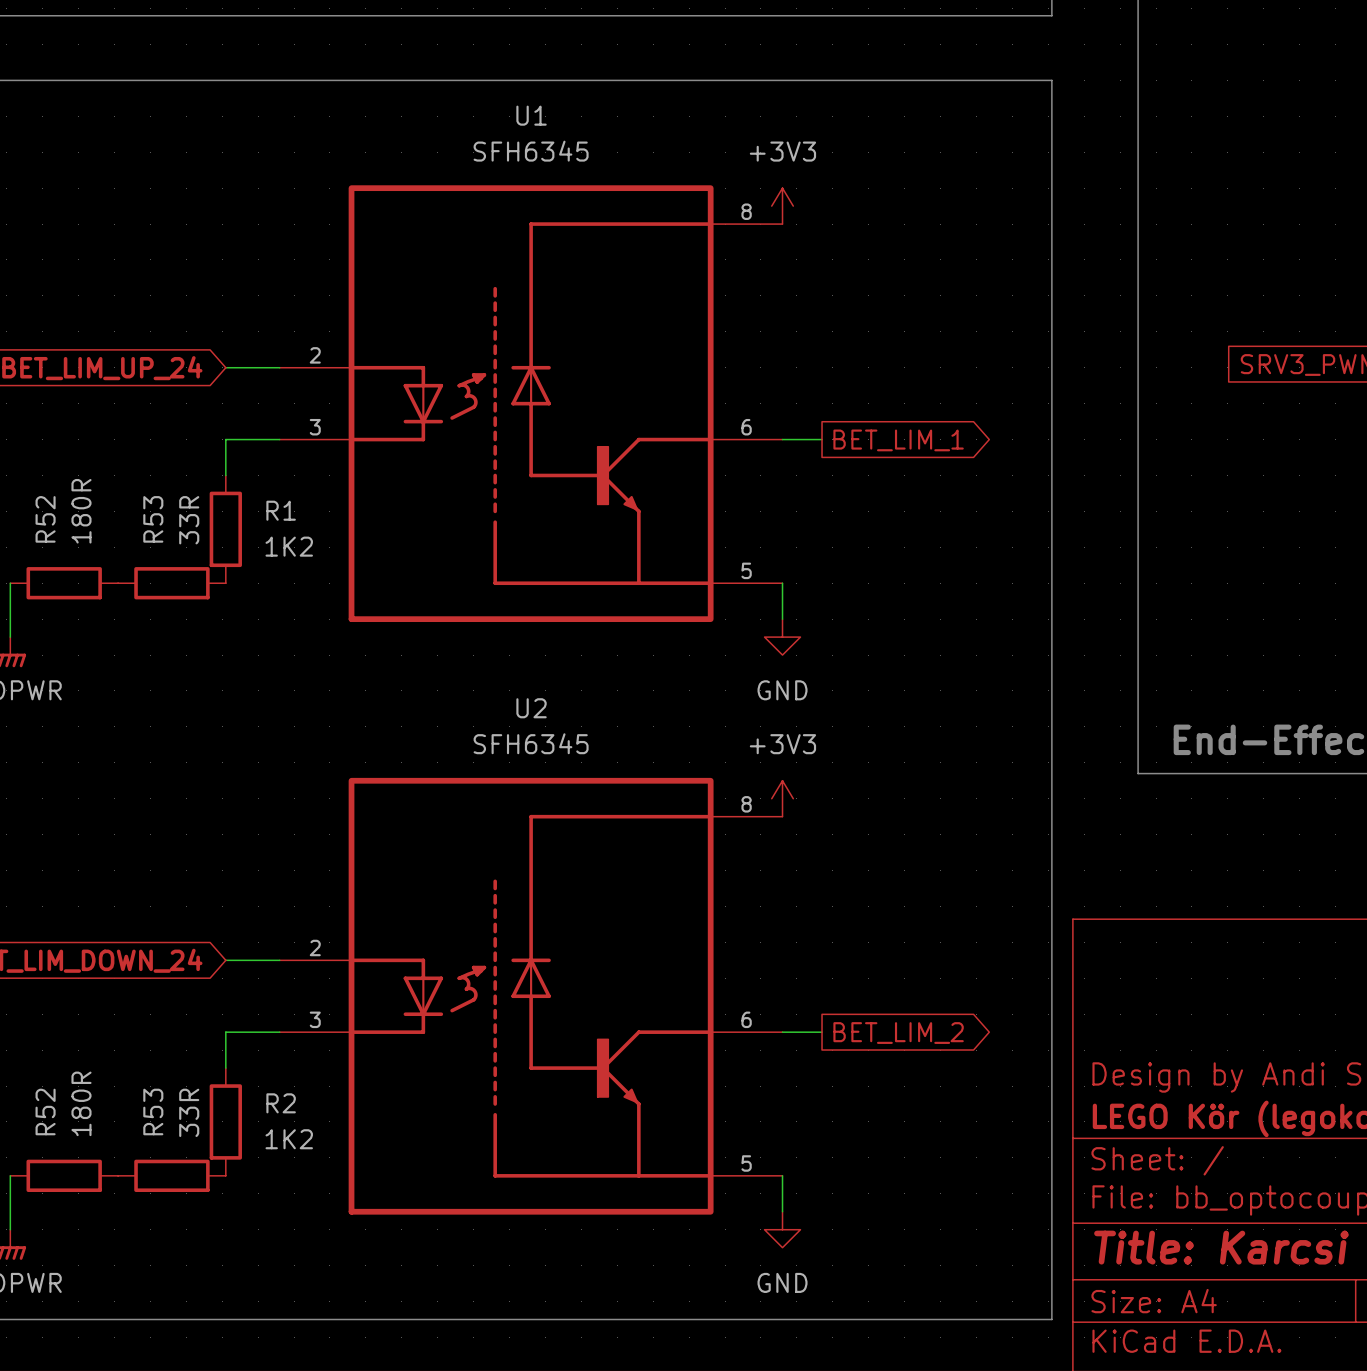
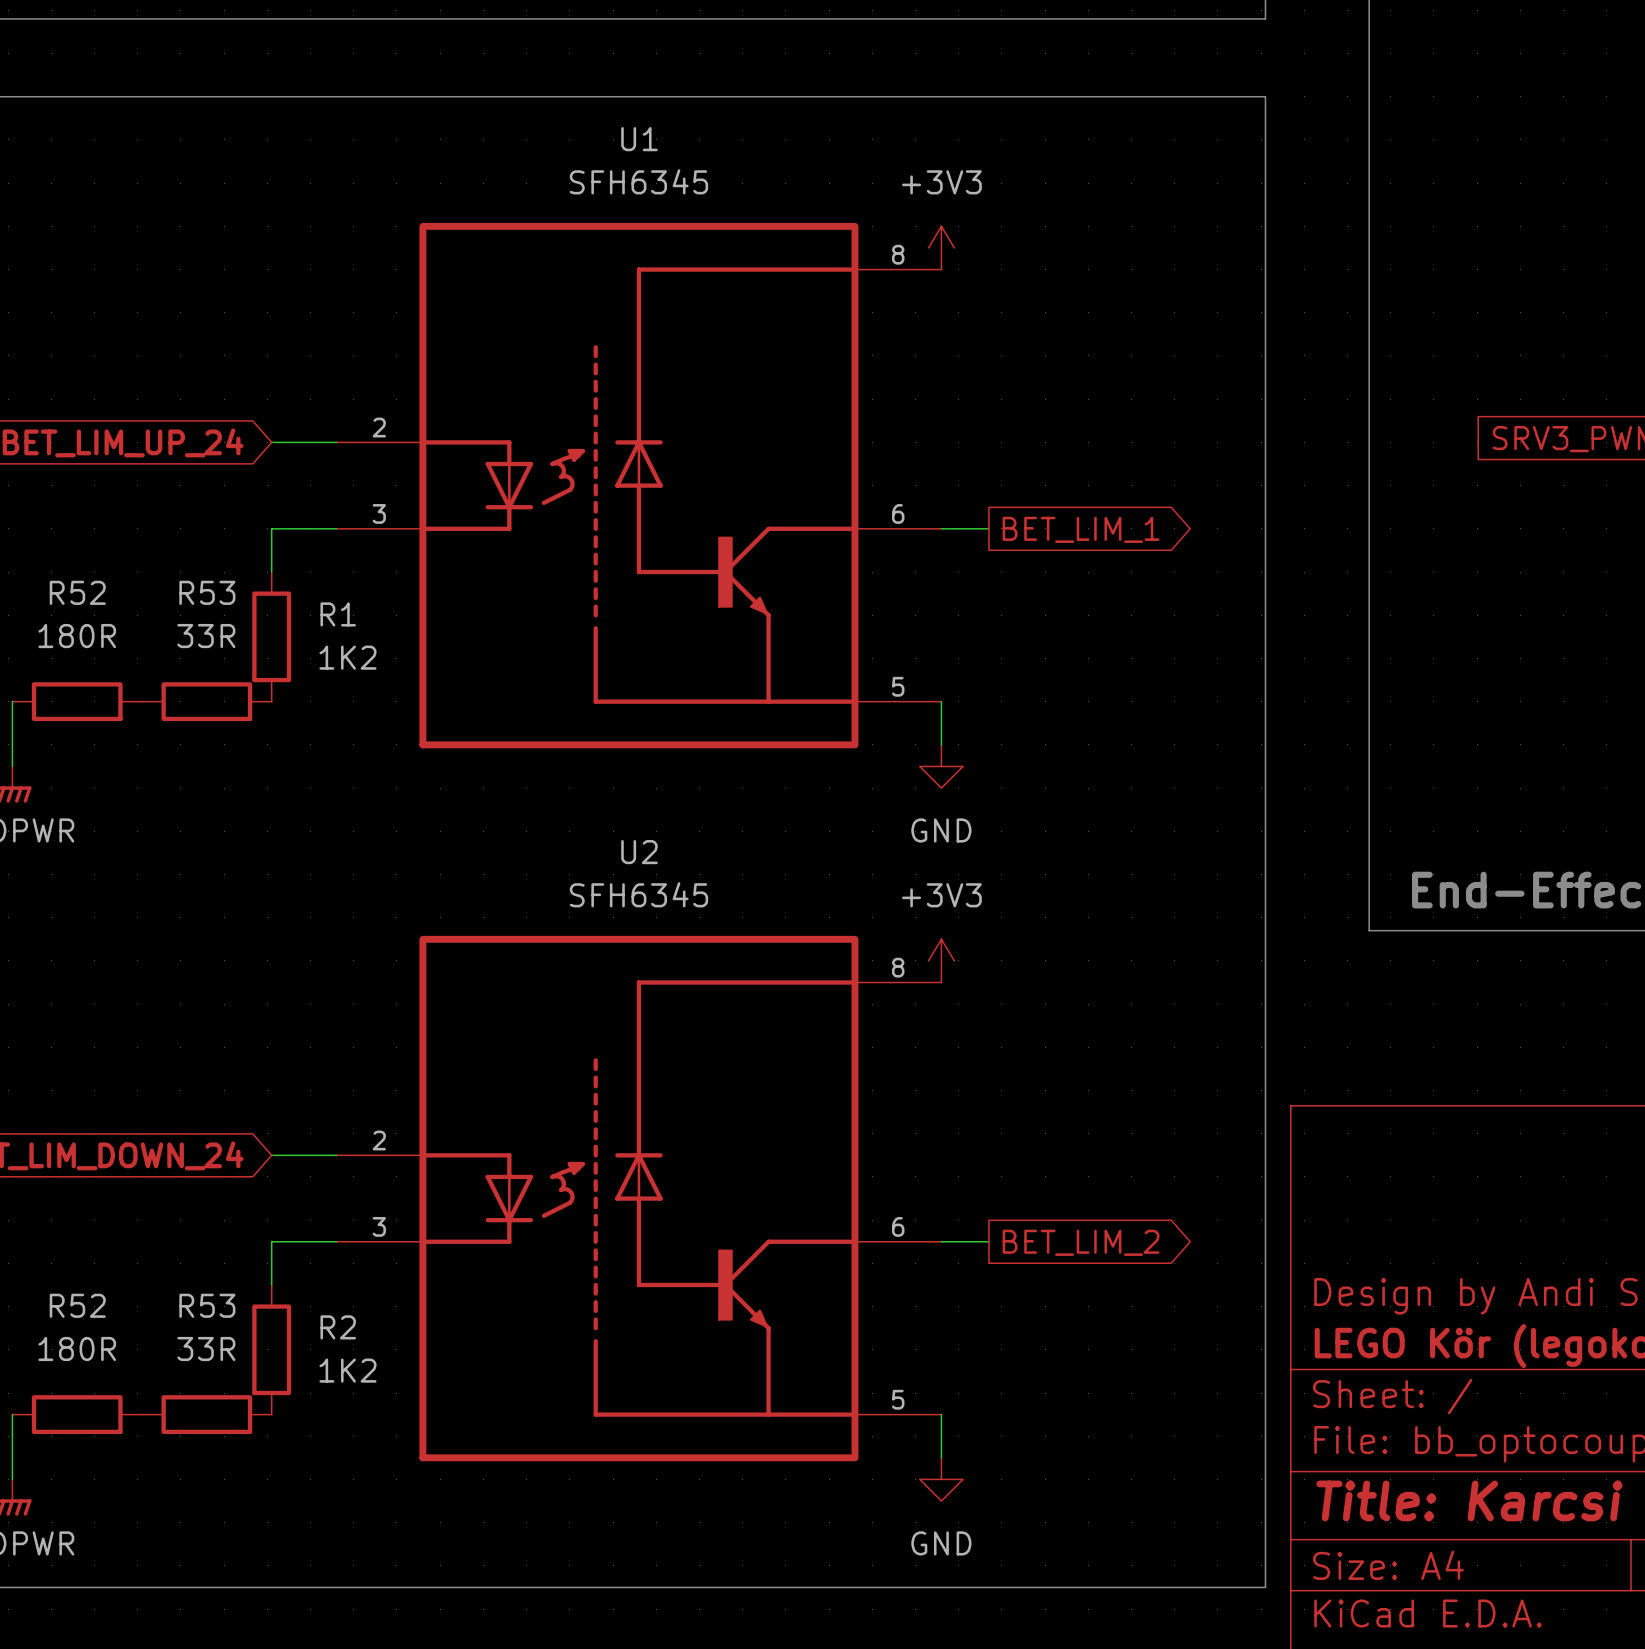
R52 value rotation: 0° (81, 511) -> 90° clockwise (77, 636)
R52 name rotation: 0° (45, 519) -> 90° clockwise (77, 592)
R53 name rotation: 0° (153, 519) -> 90° clockwise (207, 592)
R53 value rotation: 0° (189, 520) -> 90° clockwise (206, 636)
R52 value rotation: 0° (81, 1103) -> 90° clockwise (77, 1348)
R52 name rotation: 0° (45, 1111) -> 90° clockwise (77, 1305)
R53 name rotation: 0° (153, 1111) -> 90° clockwise (207, 1305)
R53 value rotation: 0° (189, 1112) -> 90° clockwise (206, 1348)

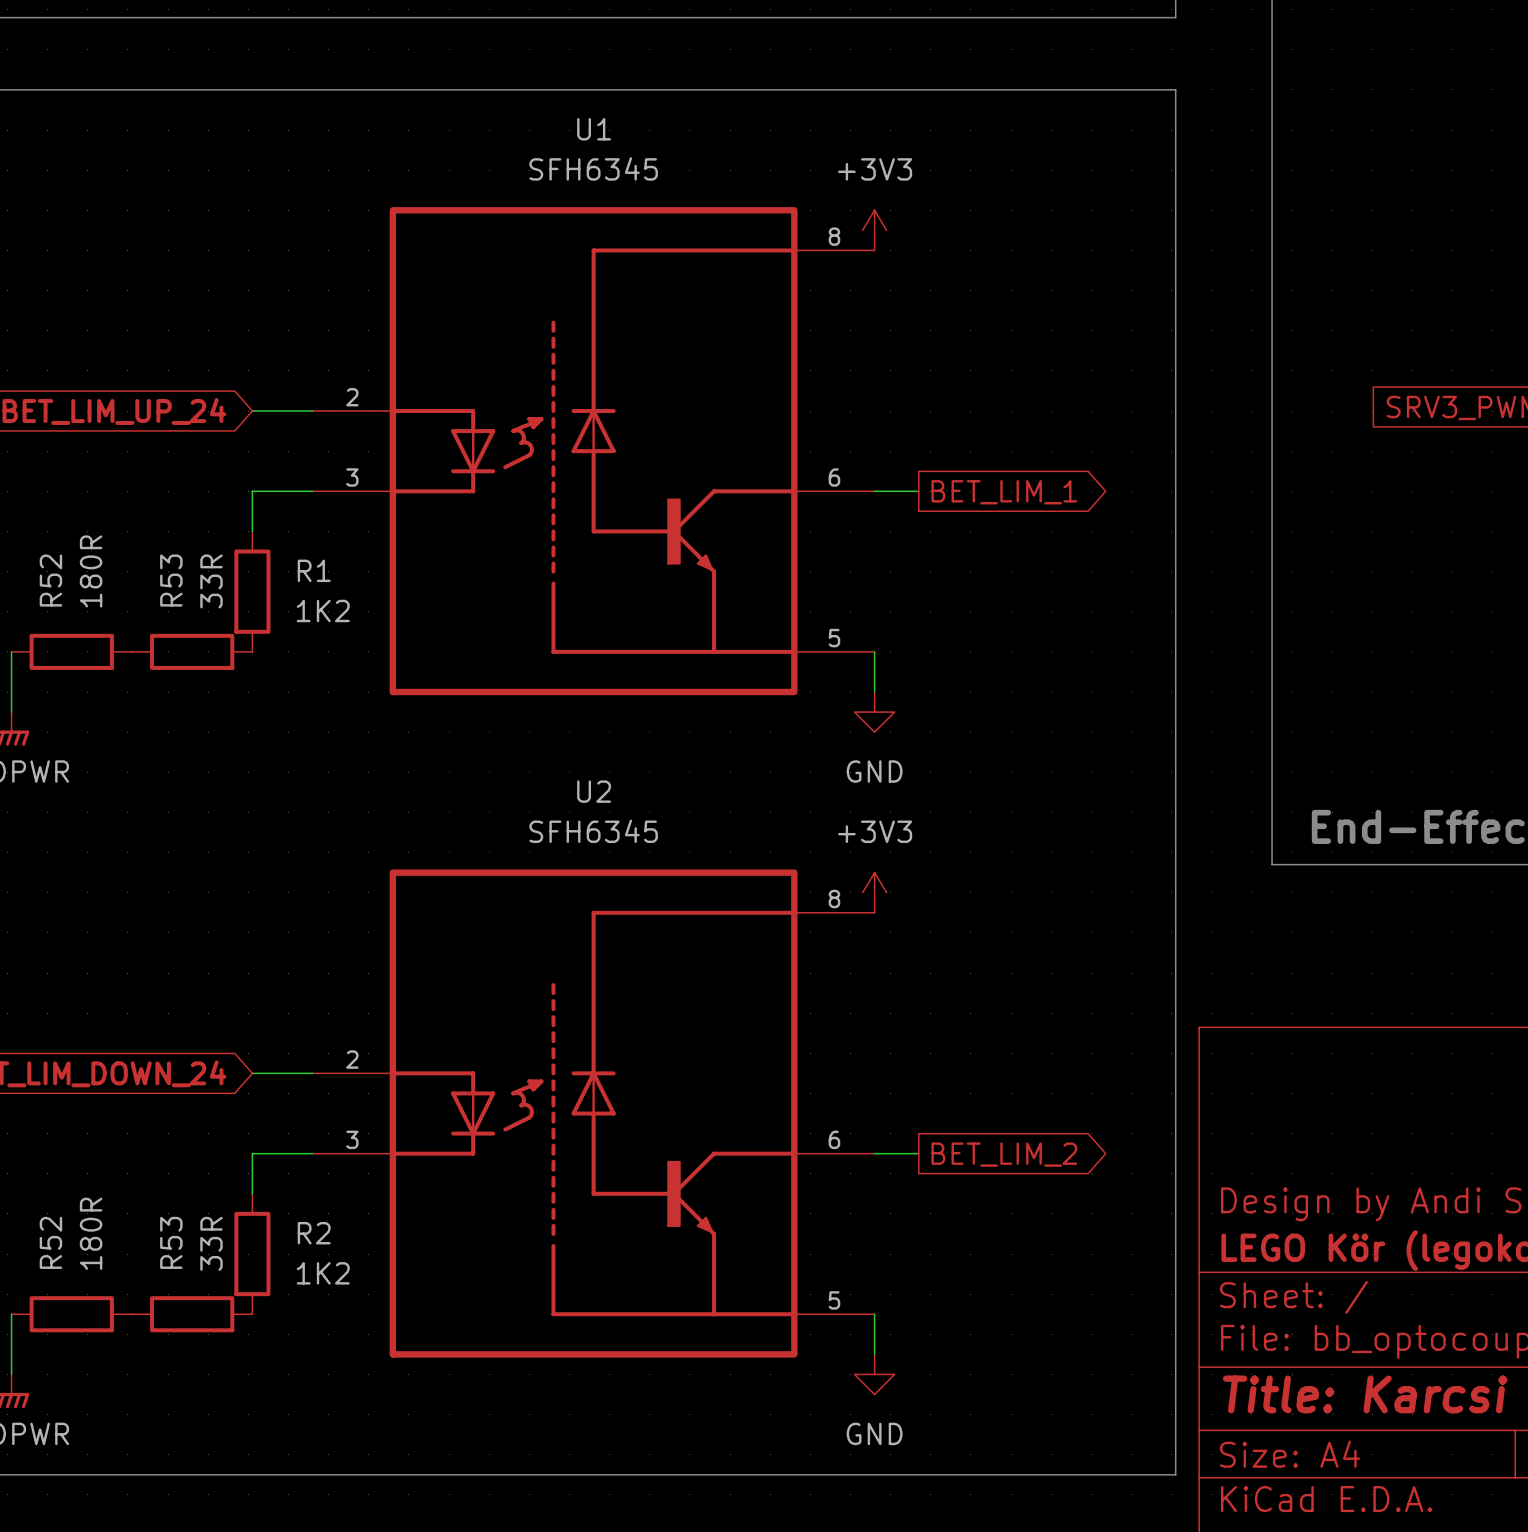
R52 name rotation: 0° (77, 592) -> 90° counterclockwise (50, 580)
R53 name rotation: 0° (207, 592) -> 90° counterclockwise (171, 580)
R52 value rotation: 0° (77, 636) -> 90° counterclockwise (91, 571)
R53 value rotation: 0° (206, 636) -> 90° counterclockwise (211, 581)
R52 name rotation: 0° (77, 1305) -> 90° counterclockwise (50, 1242)
R53 name rotation: 0° (207, 1305) -> 90° counterclockwise (171, 1242)
R52 value rotation: 0° (77, 1348) -> 90° counterclockwise (91, 1233)
R53 value rotation: 0° (206, 1348) -> 90° counterclockwise (211, 1243)

